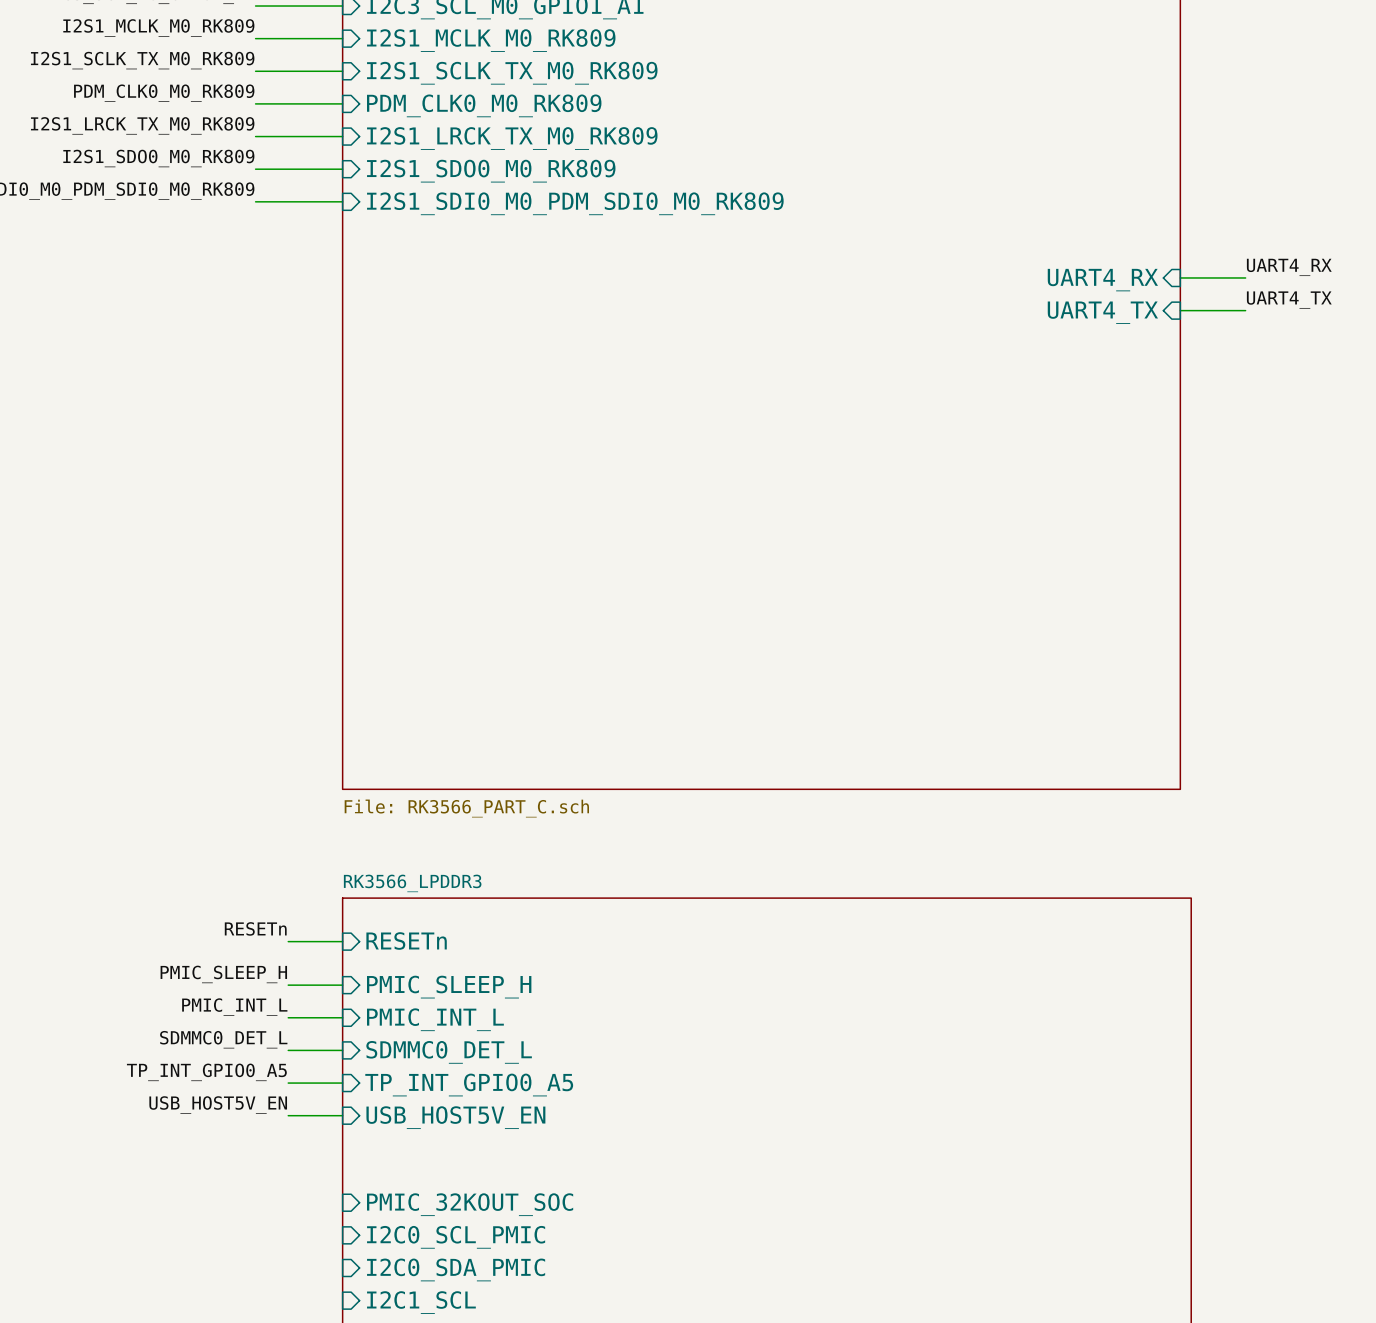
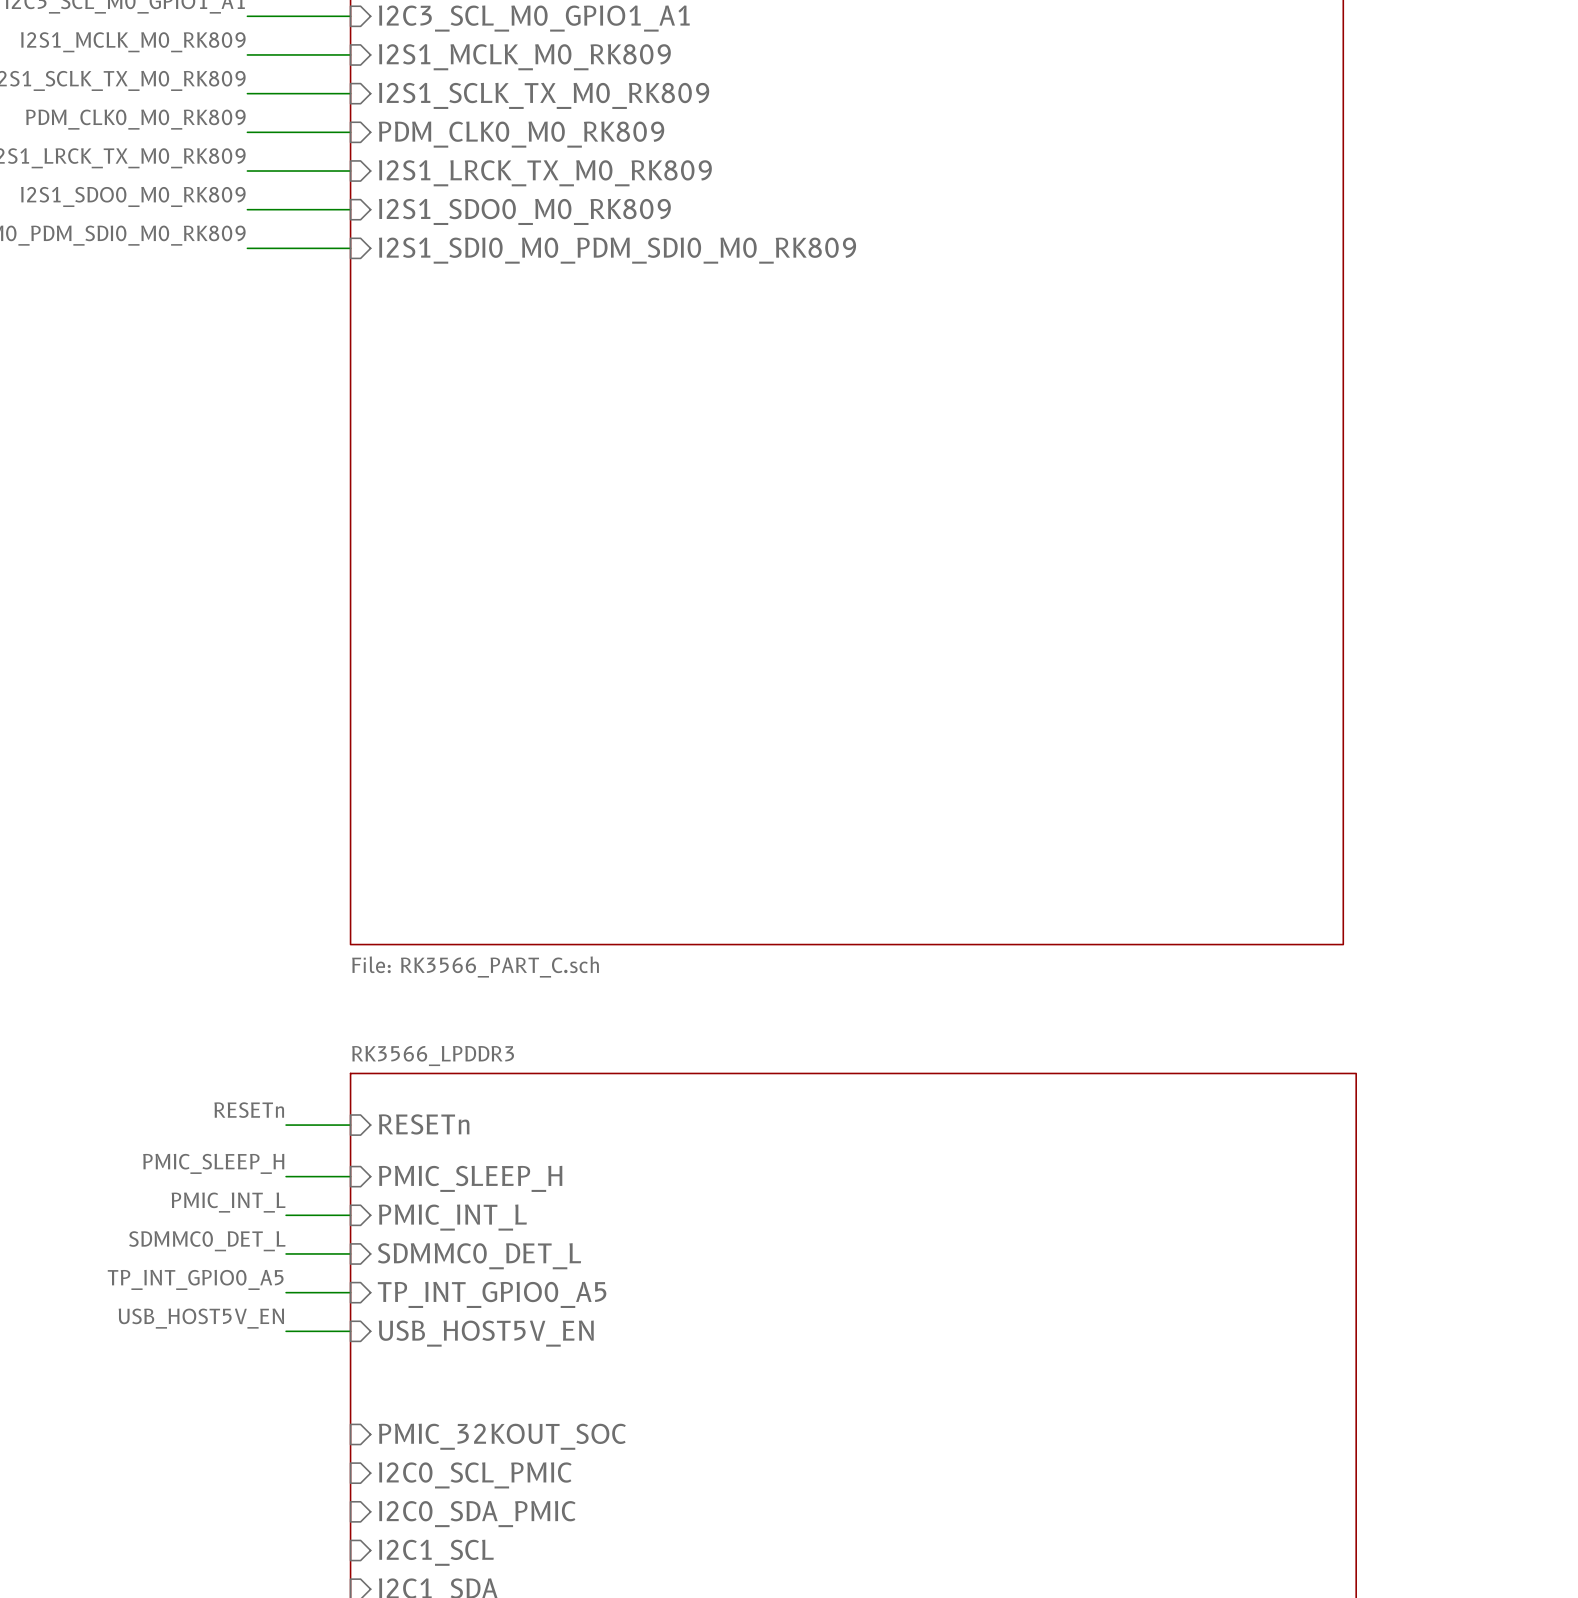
label: UART4_RX (1289, 267) -> none
wire: (1180, 277) (1245, 277) -> none
sheet pin: UART4_RX (1102, 280) -> none
label: UART4_TX (1289, 300) -> none
wire: (1180, 310) (1245, 310) -> none
sheet pin: UART4_TX (1102, 312) -> none

